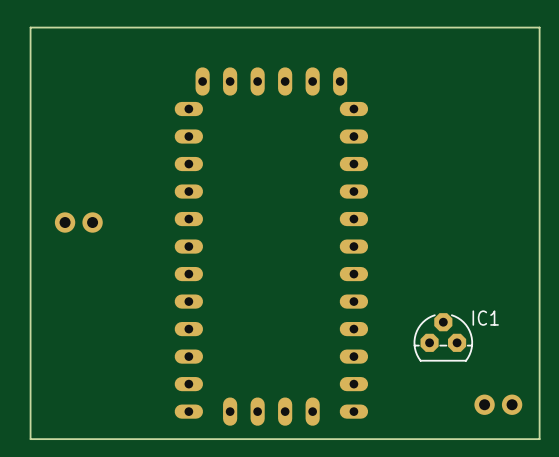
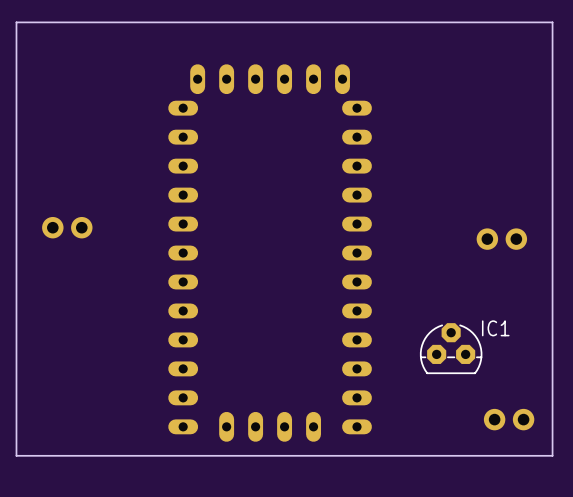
part: none -> (501, 239)

